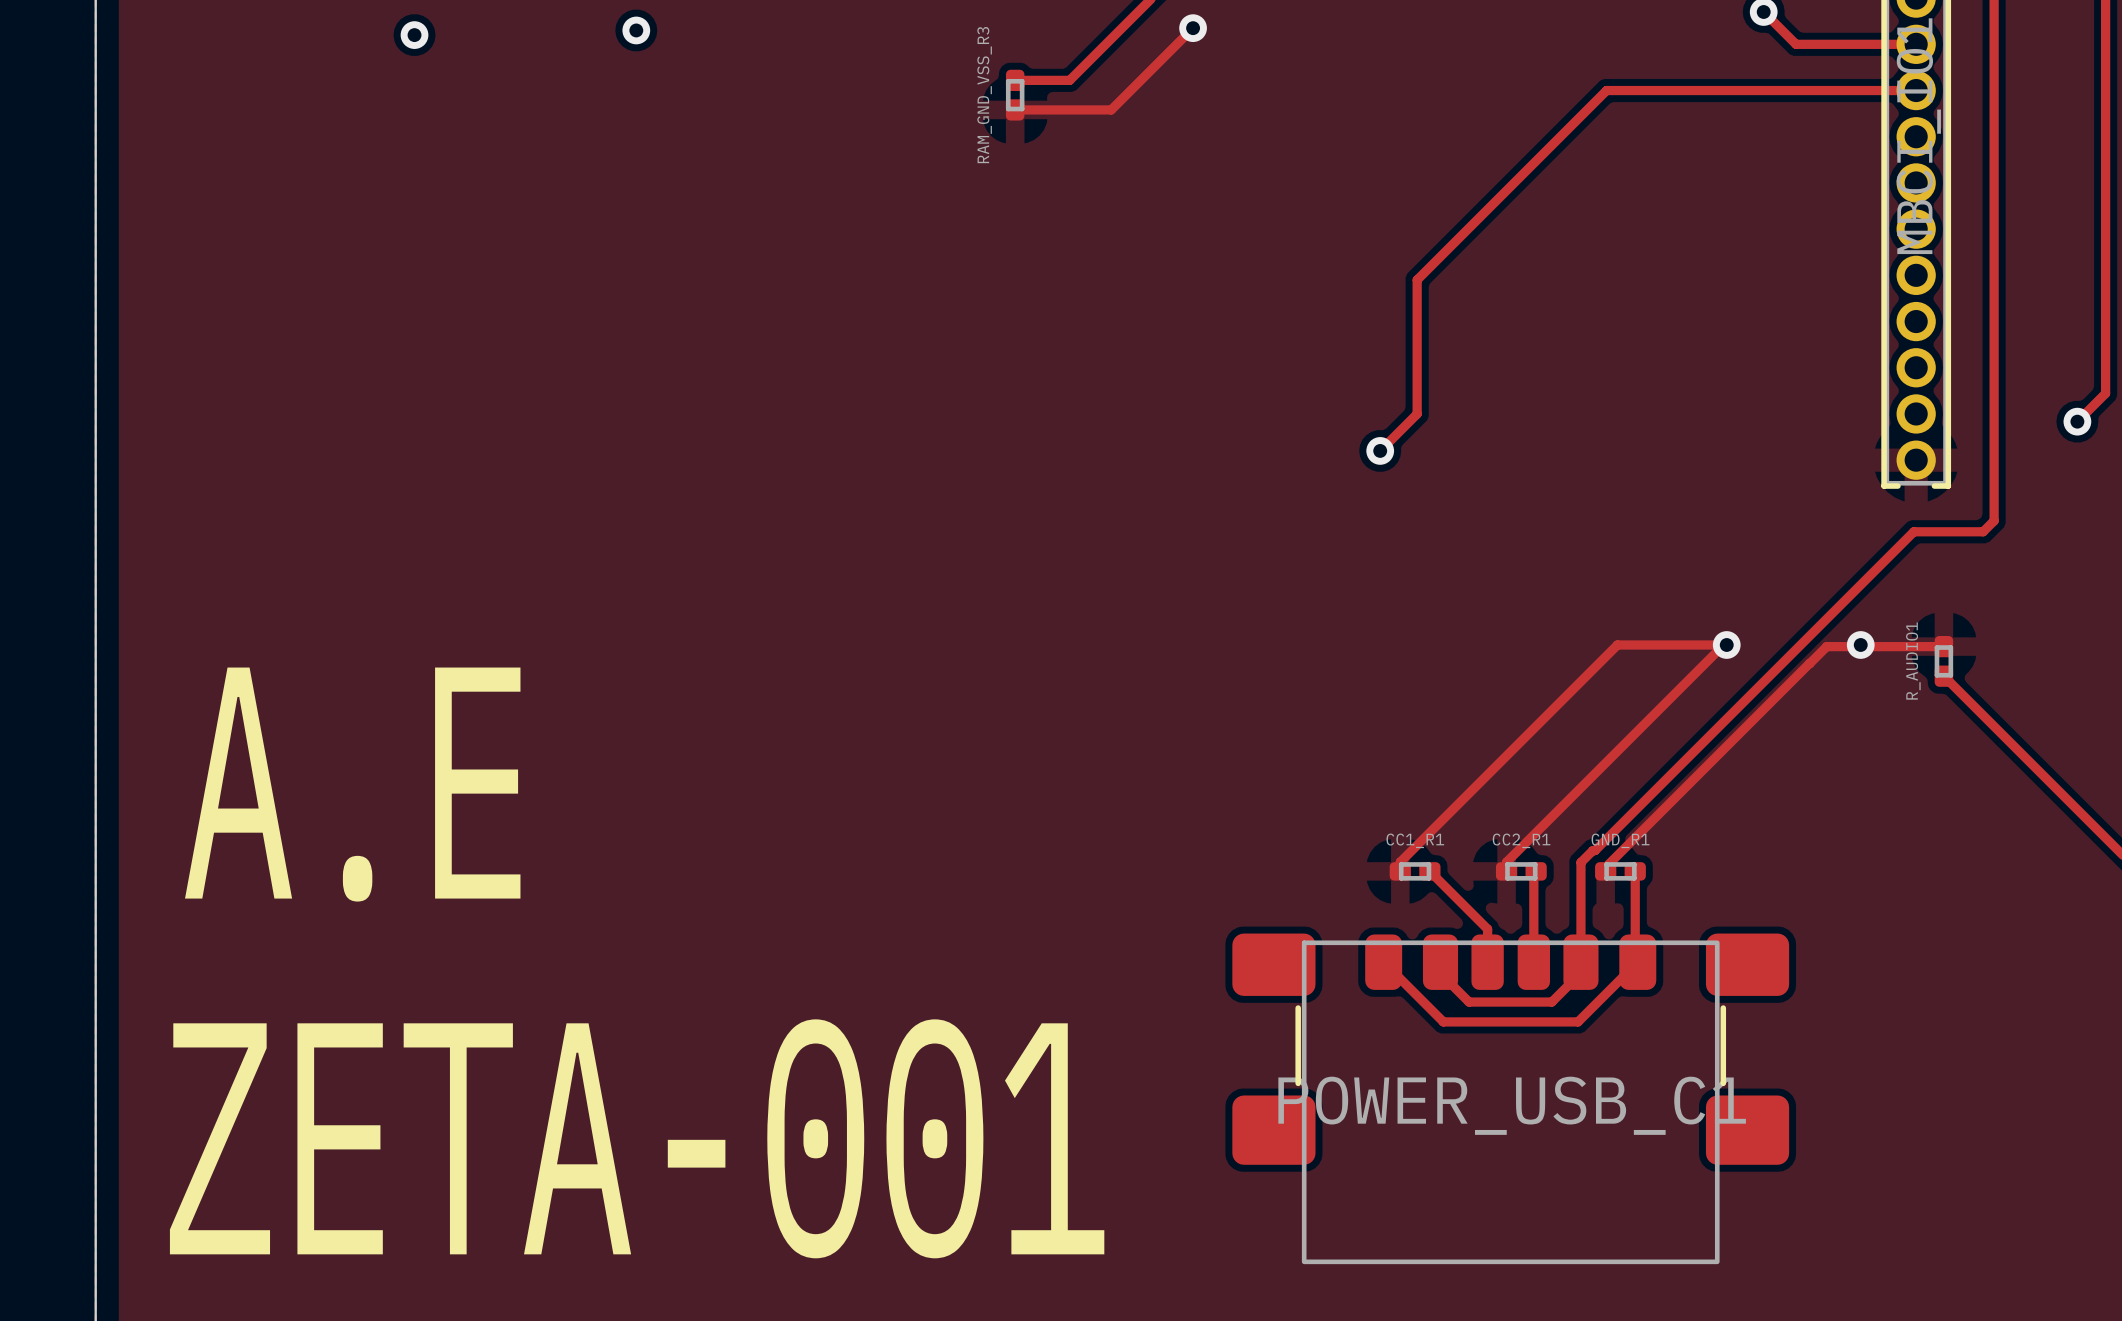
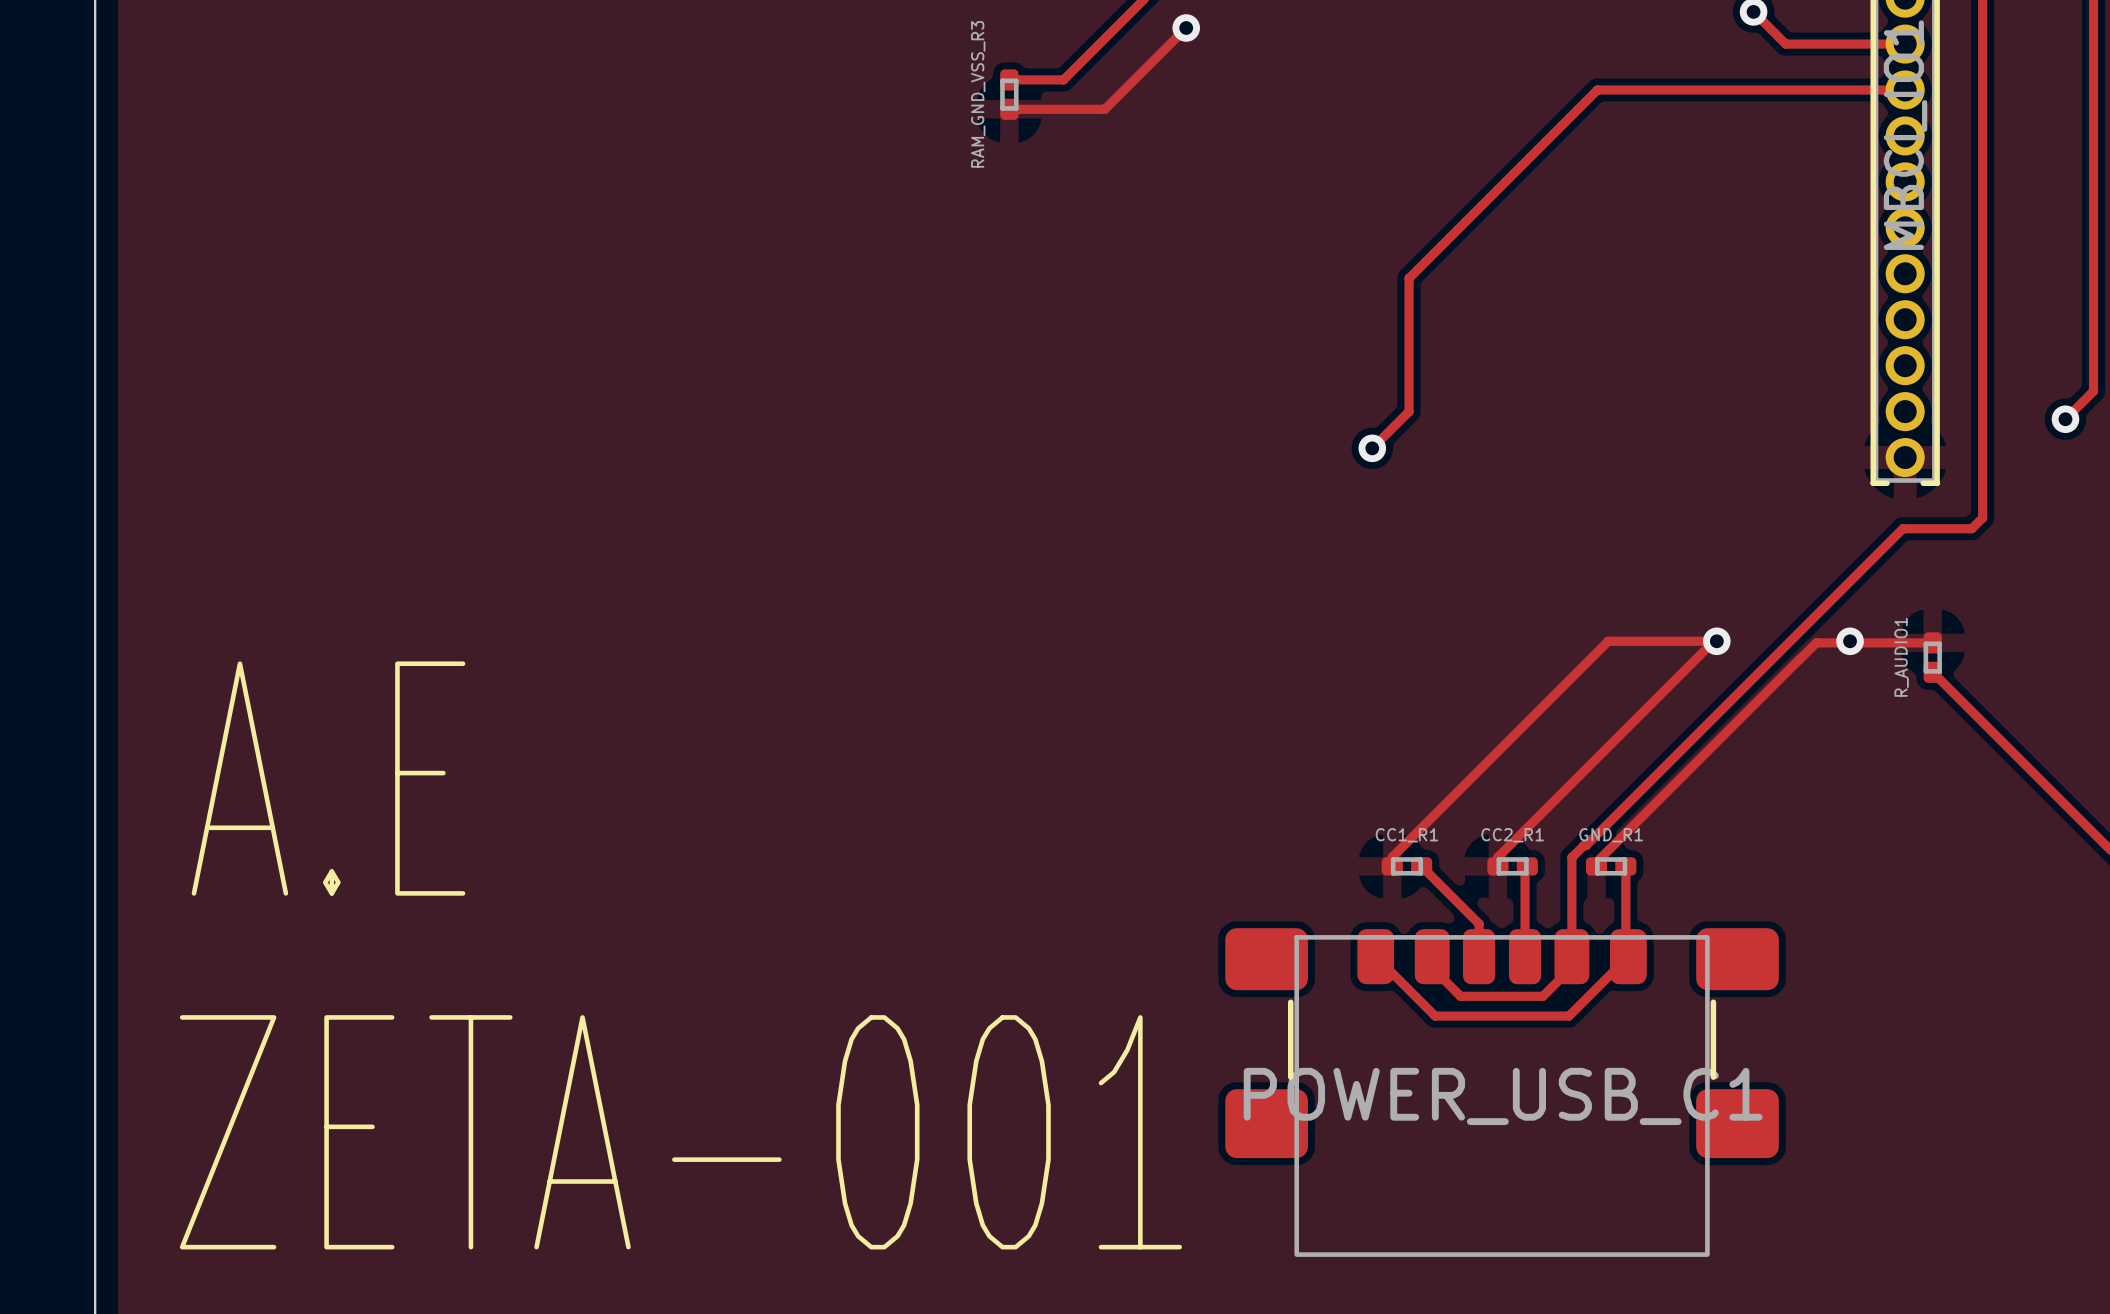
via: (636, 30) -> none
via: (414, 35) -> none

